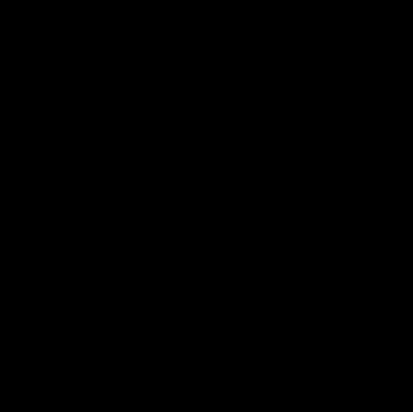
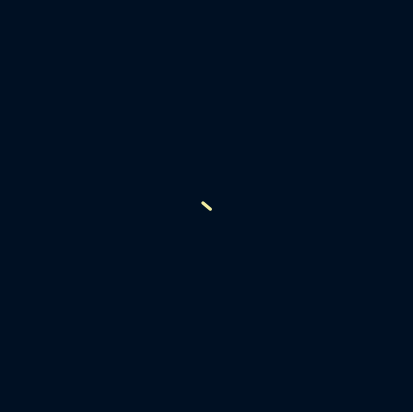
line: none -> (202, 202) (210, 209)

